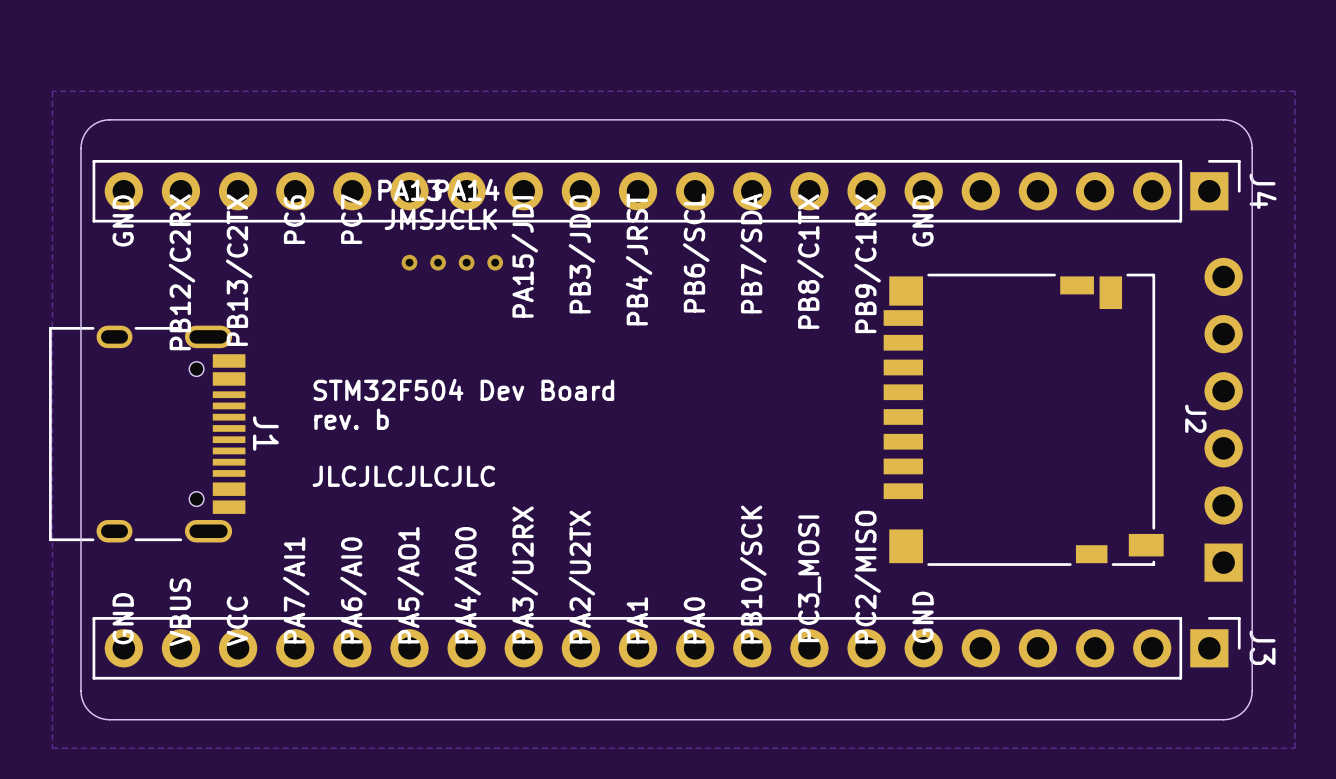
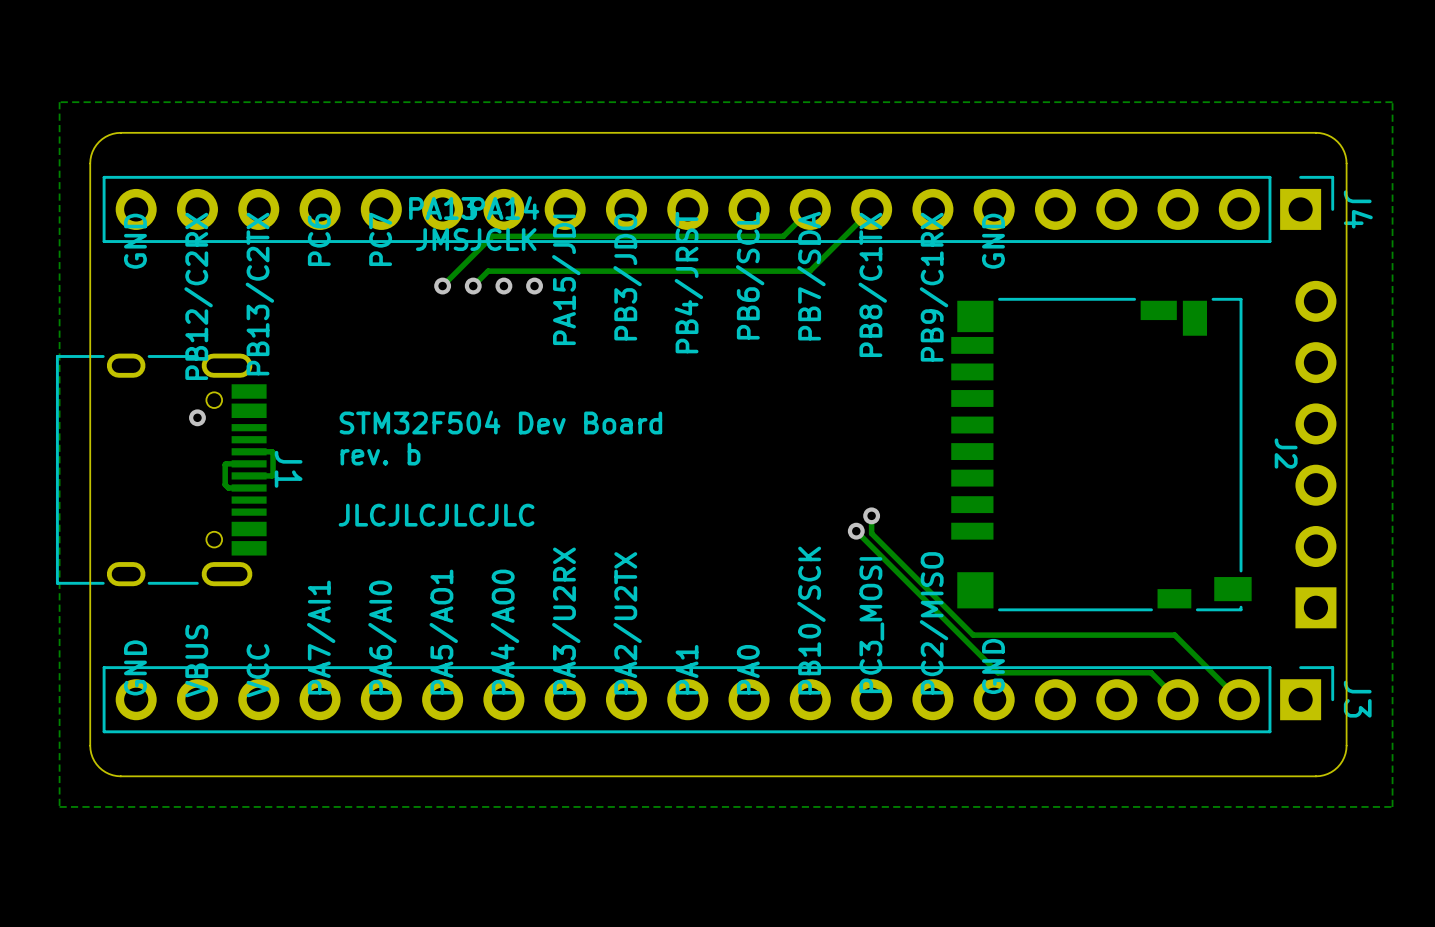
track: none -> (810, 209) (783, 236) (492, 236) (442, 286)
track: none -> (871, 209) (809, 271) (488, 271) (473, 286)
via: none -> (197, 417)
track: none -> (249, 451) (273, 452) (272, 475) (249, 475)
track: none -> (249, 463) (225, 464) (225, 484) (228, 487) (249, 487)
track: none -> (871, 515) (871, 533) (973, 635) (1174, 635) (1239, 699)
via: none -> (871, 515)
track: none -> (856, 531) (997, 672) (1151, 672) (1178, 699)
via: none -> (856, 531)

